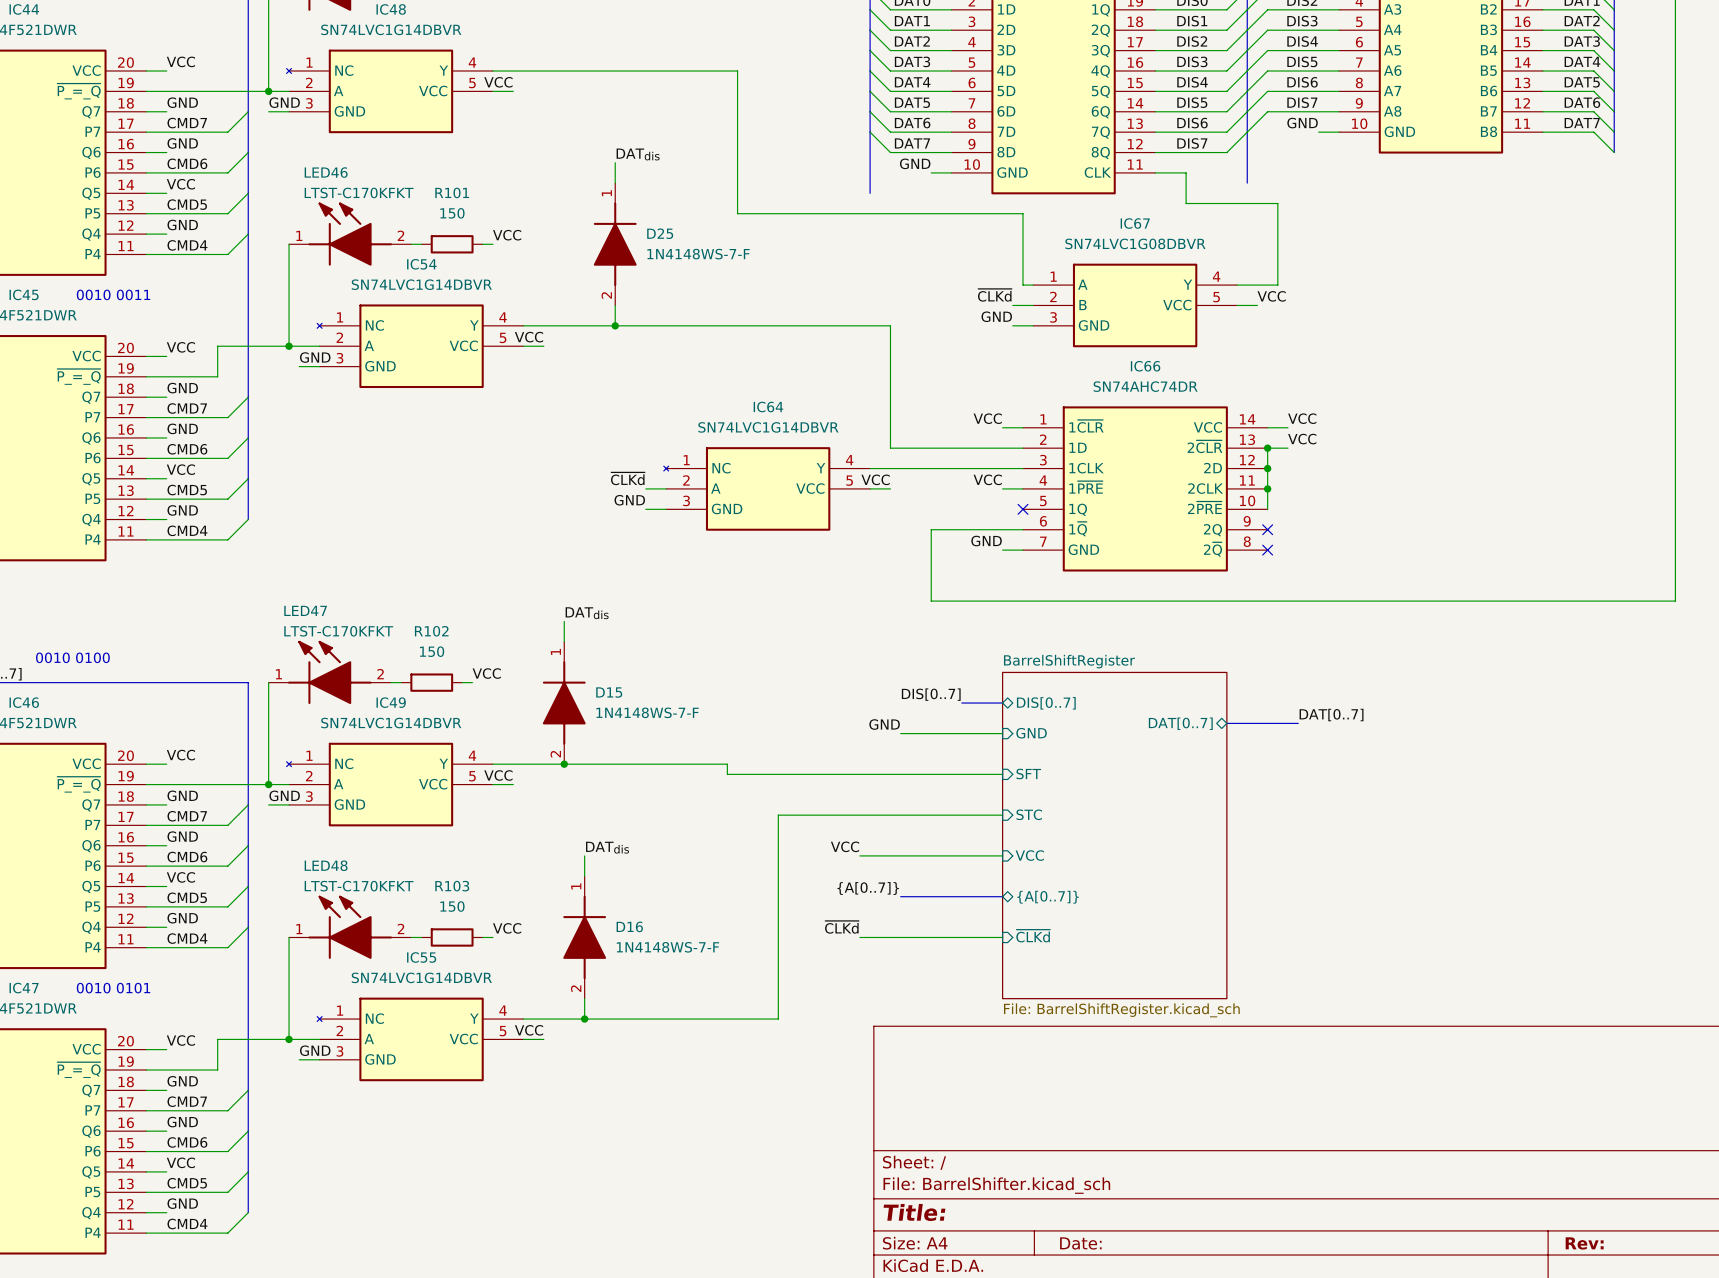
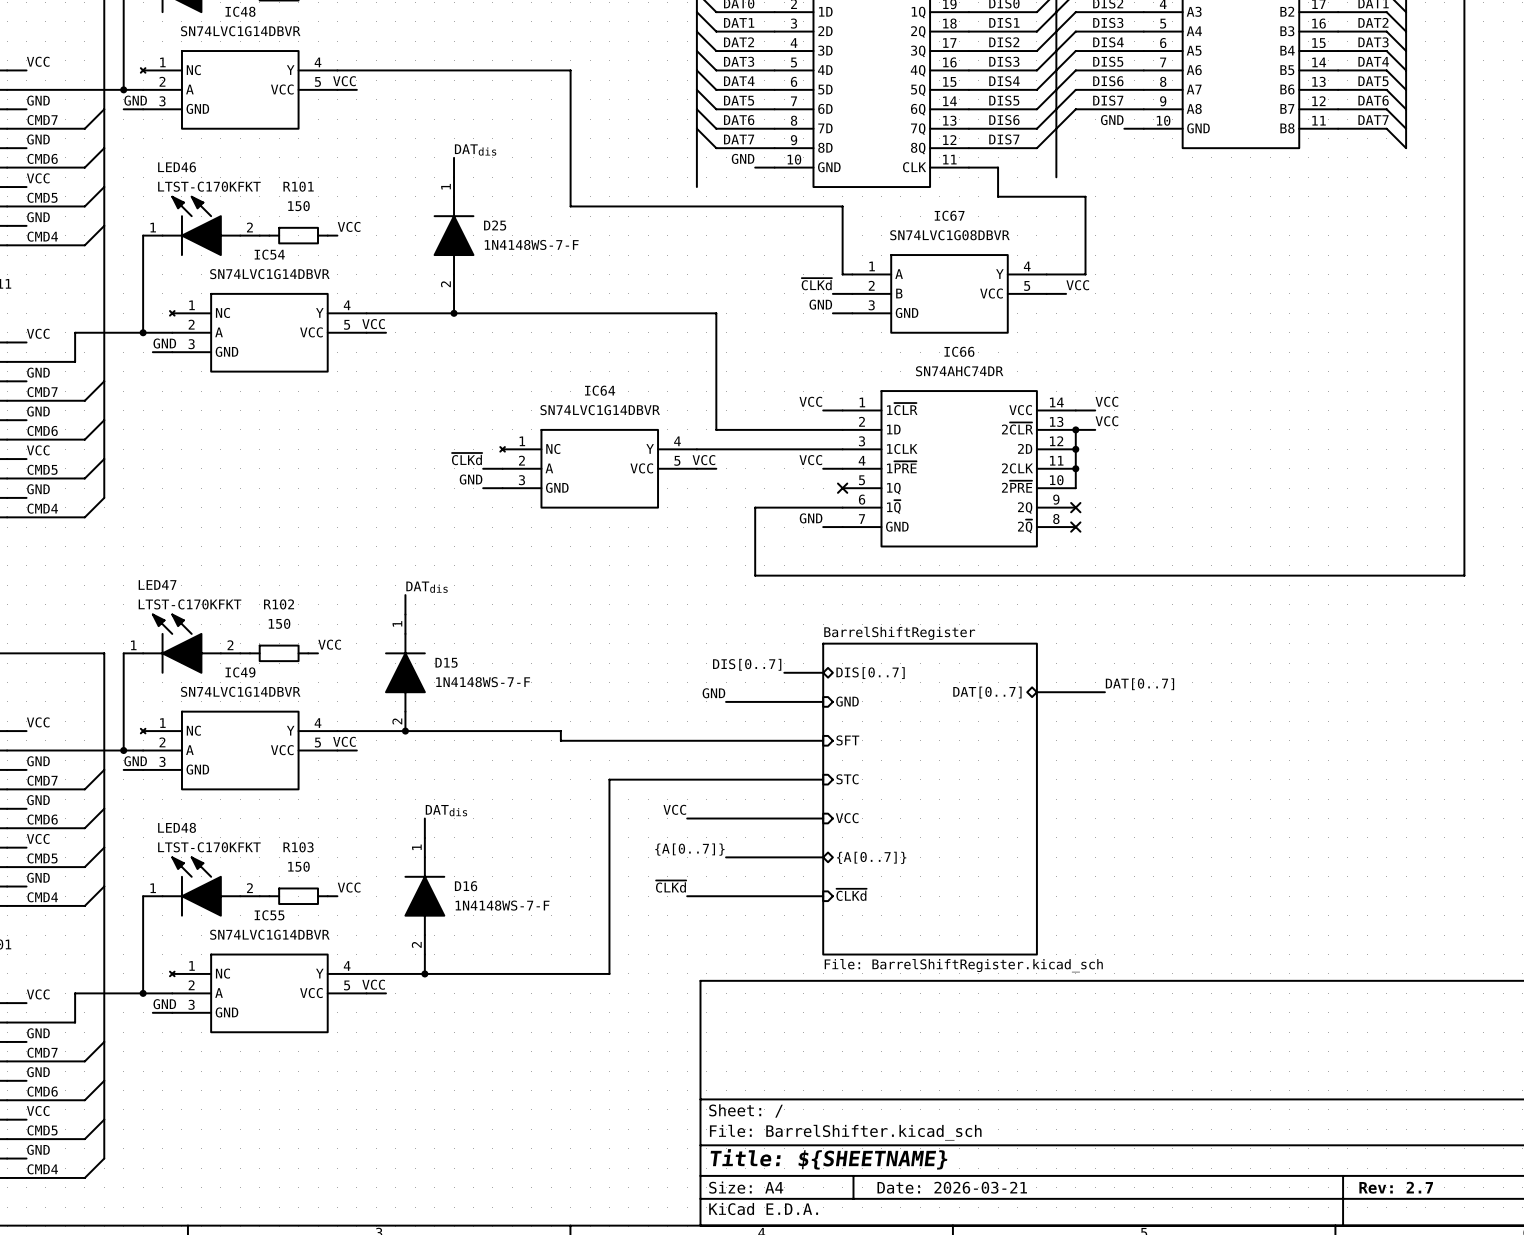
title block: Title: (914, 1212) -> Title: ${SHEETNAME} (828, 1159)
title block: Date: (1080, 1243) -> Date: 2026-03-21 (952, 1187)
title block: Rev: (1584, 1243) -> Rev: 2.7 (1396, 1187)

